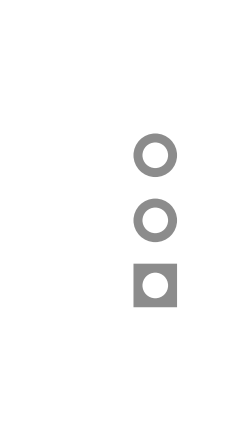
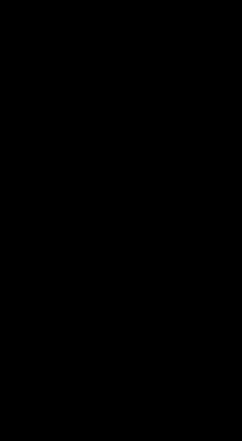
part: (155, 220) -> none

